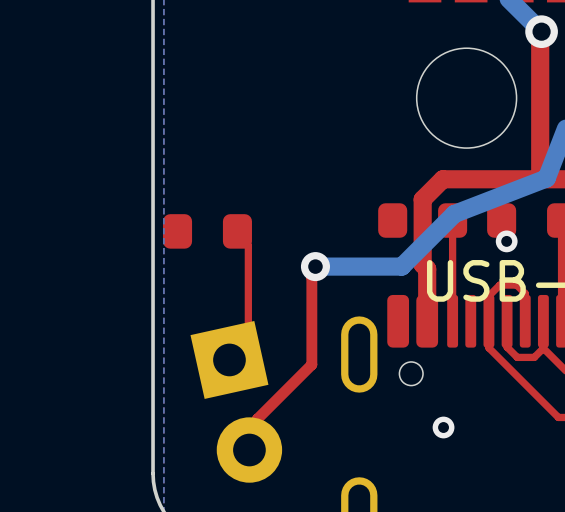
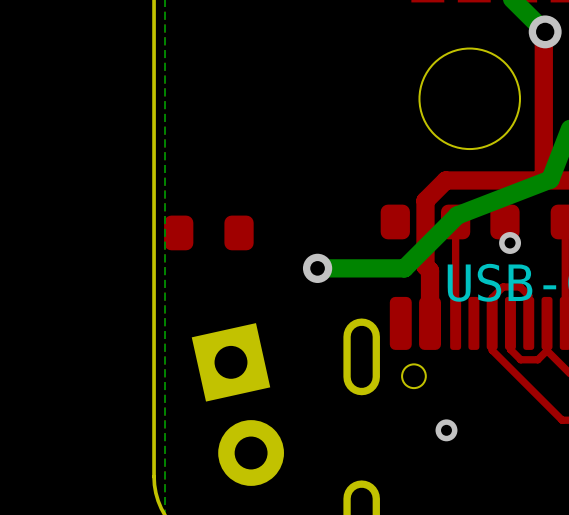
top track: (237, 231) (248, 245) (248, 325) (229, 359) -> none
top track: (315, 266) (311, 277) (311, 364) (257, 419) (249, 450) -> none

